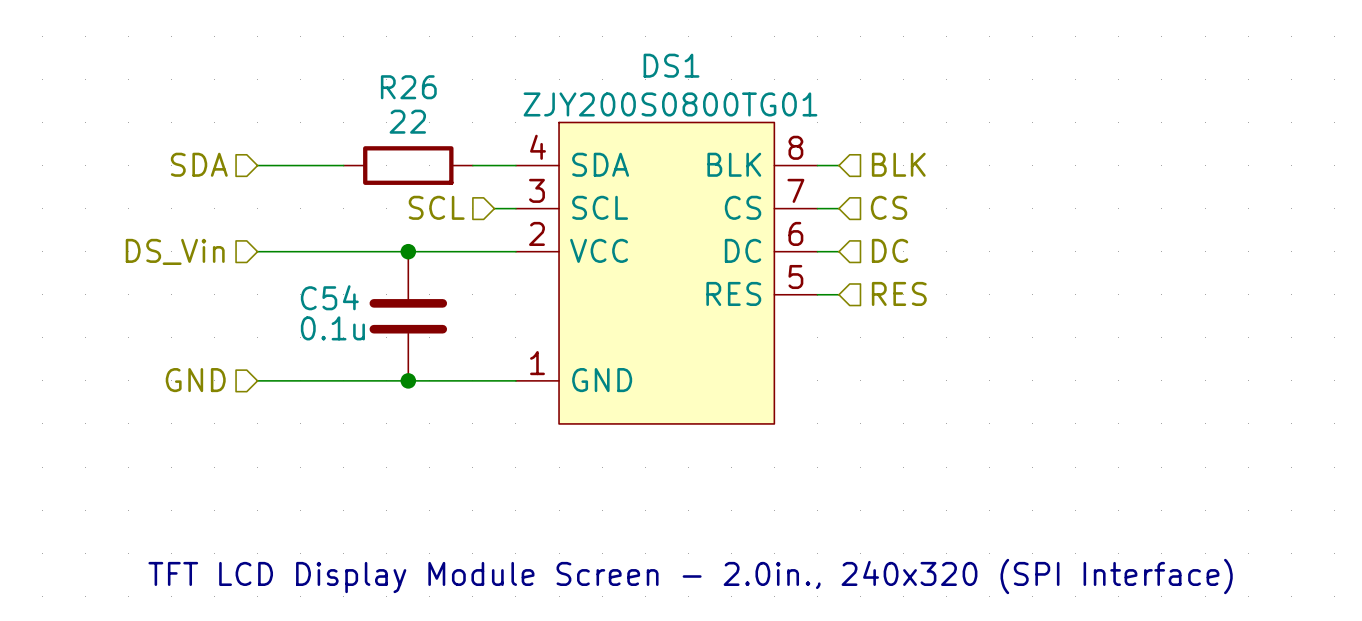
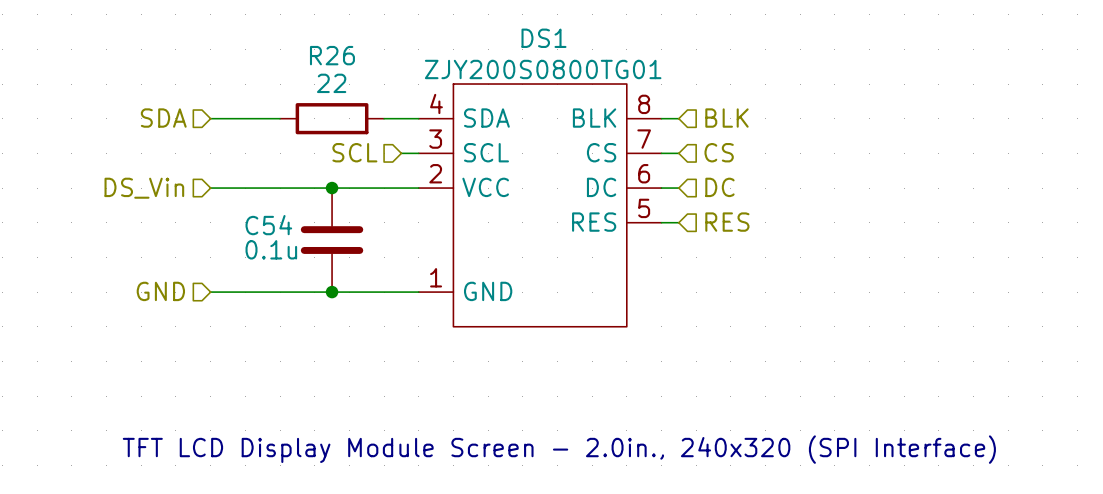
DS1 symbol: [515, 122, 818, 424] -> [418, 84, 662, 327]

